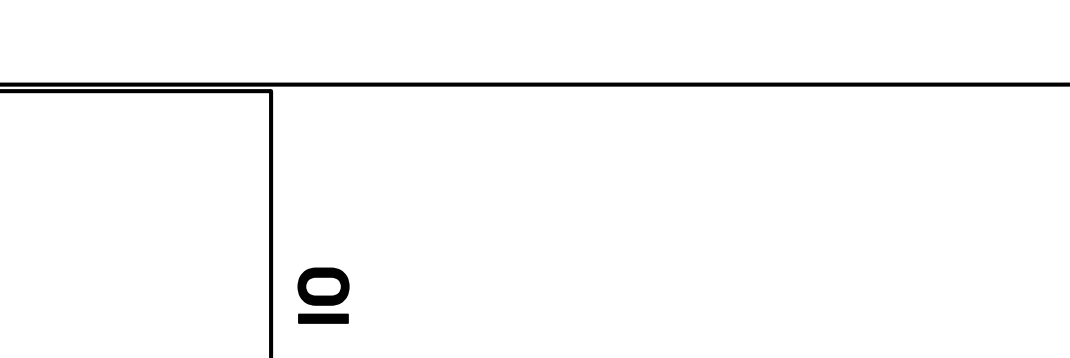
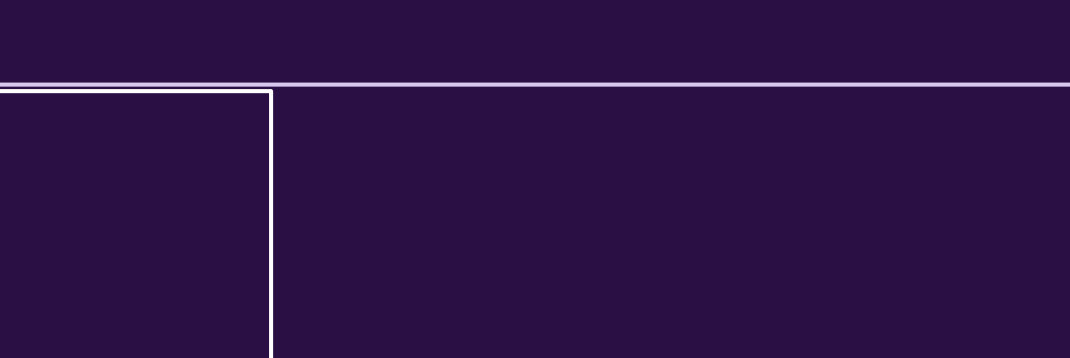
text: IO (323, 295) -> none

